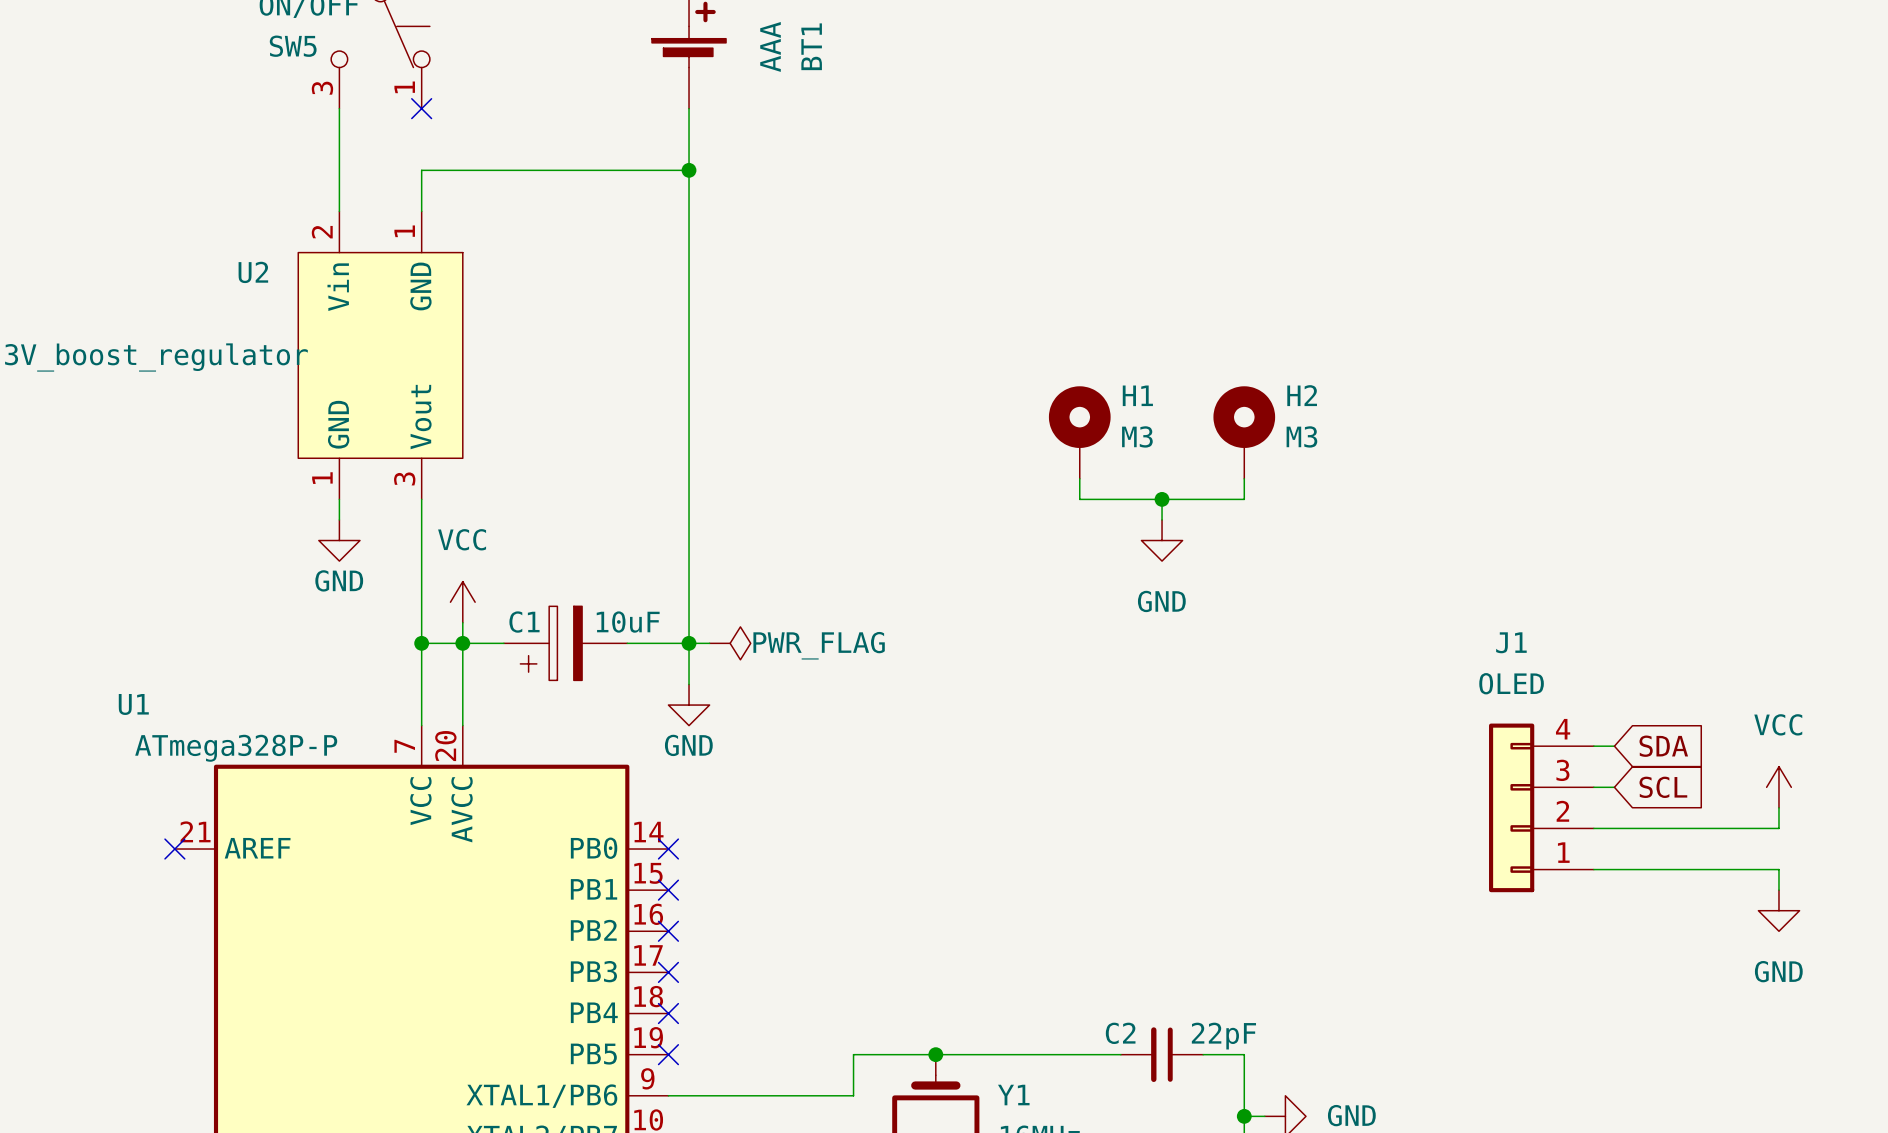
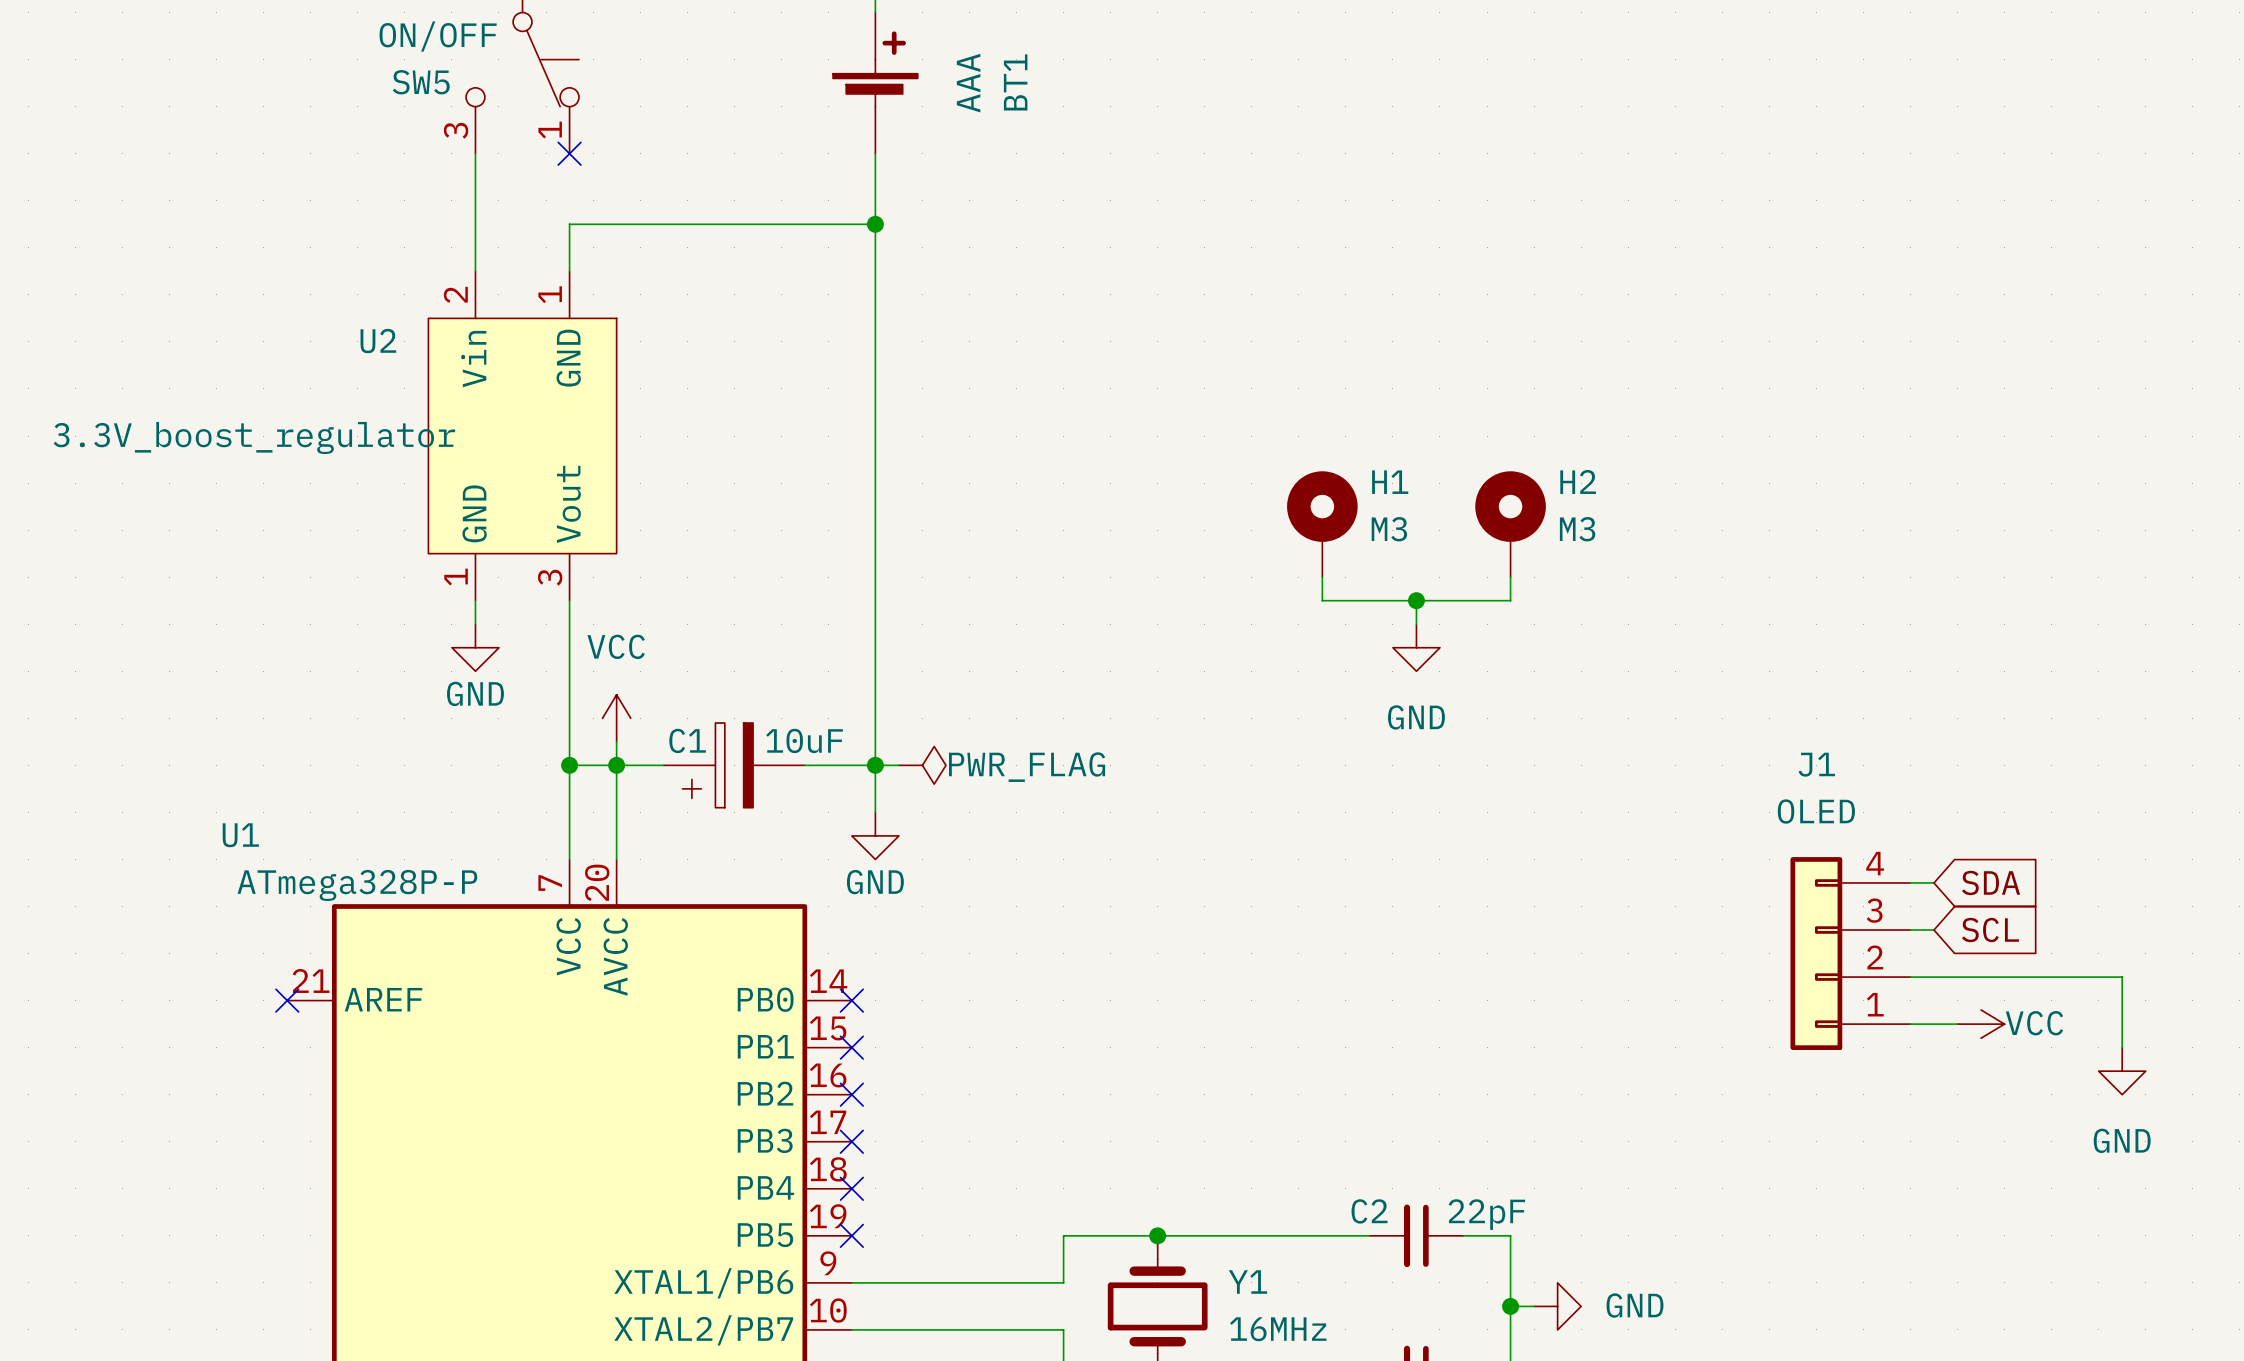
power symbol rotation: 0° (1778, 787) -> 90° clockwise (1981, 1024)
power symbol position: VCC (1778, 787) -> VCC (1981, 1024)
wire: (1778, 807) (1778, 828) -> (2122, 1024) (2122, 977)
wire: (1635, 869) (1778, 869) -> none

